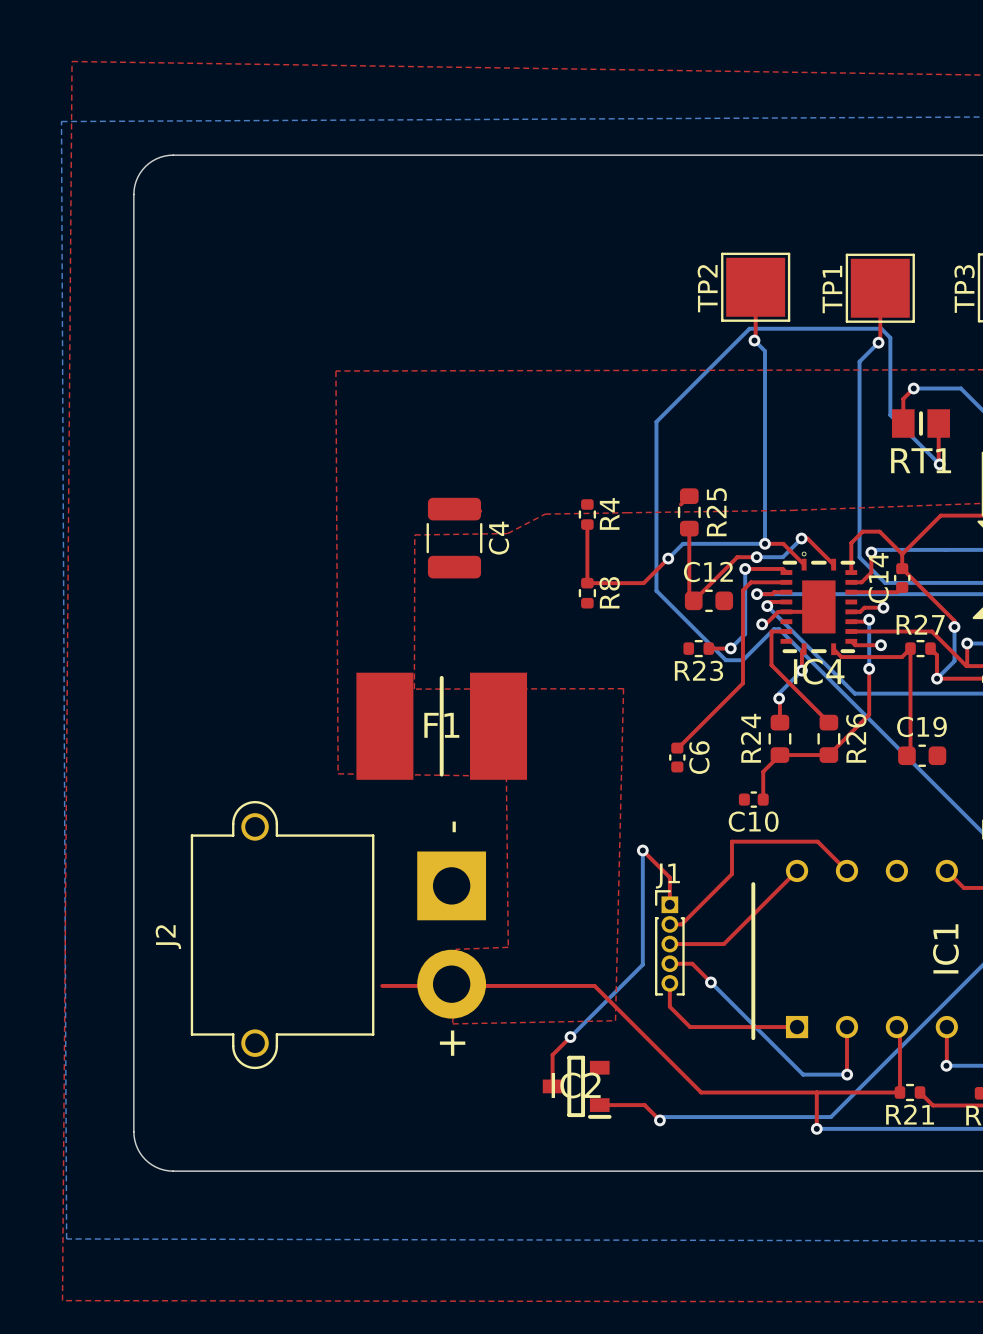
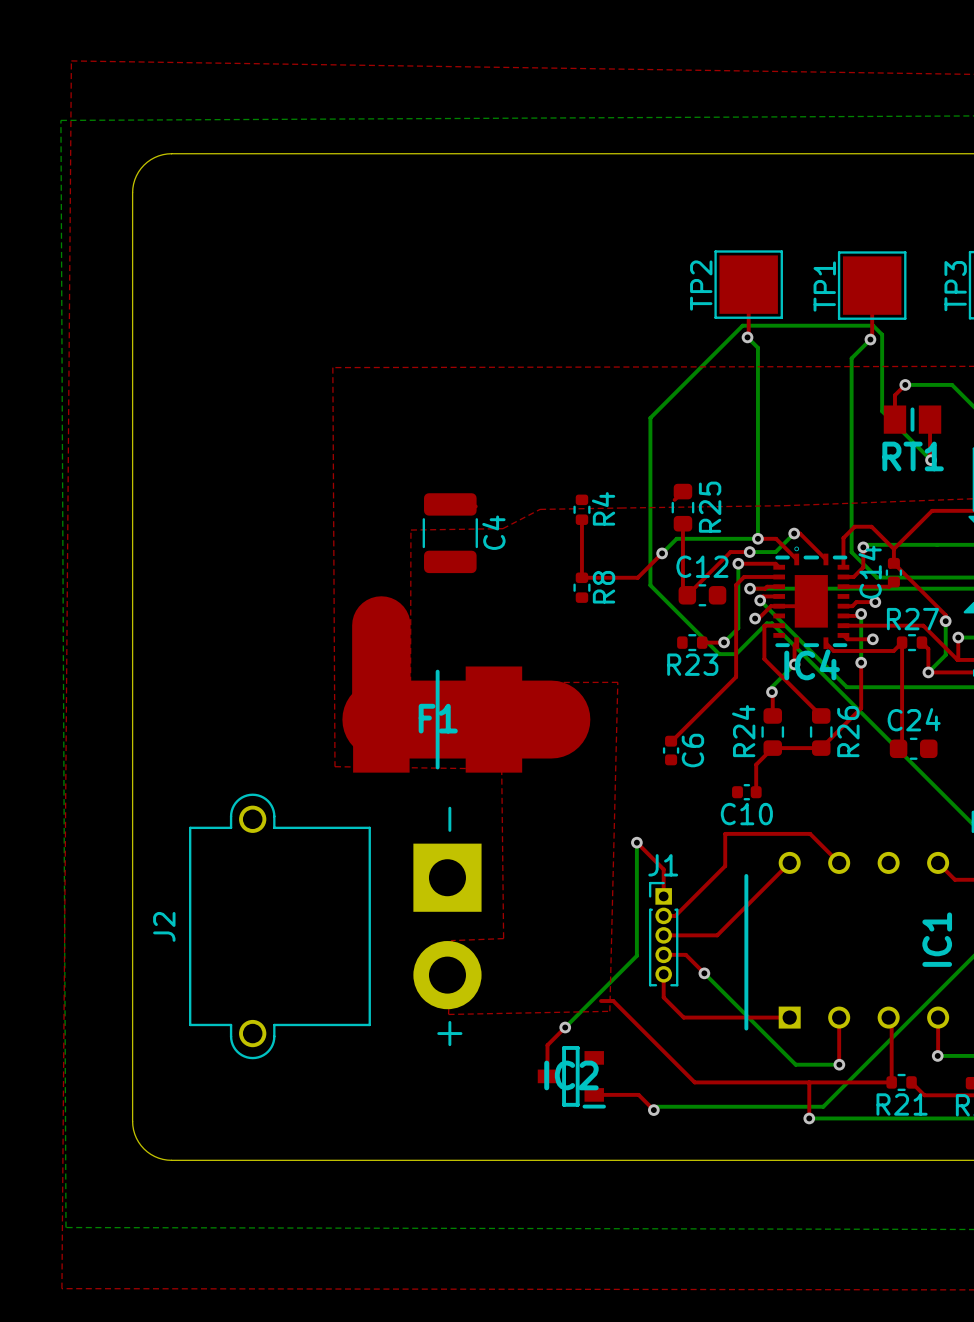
top track: none -> (377, 621) (381, 625) (381, 719) (552, 718)
C19 name: C19 (921, 726) -> C24 (914, 719)
top track: (382, 985) (594, 985) (619, 1010) -> (601, 1001) (613, 1001)

